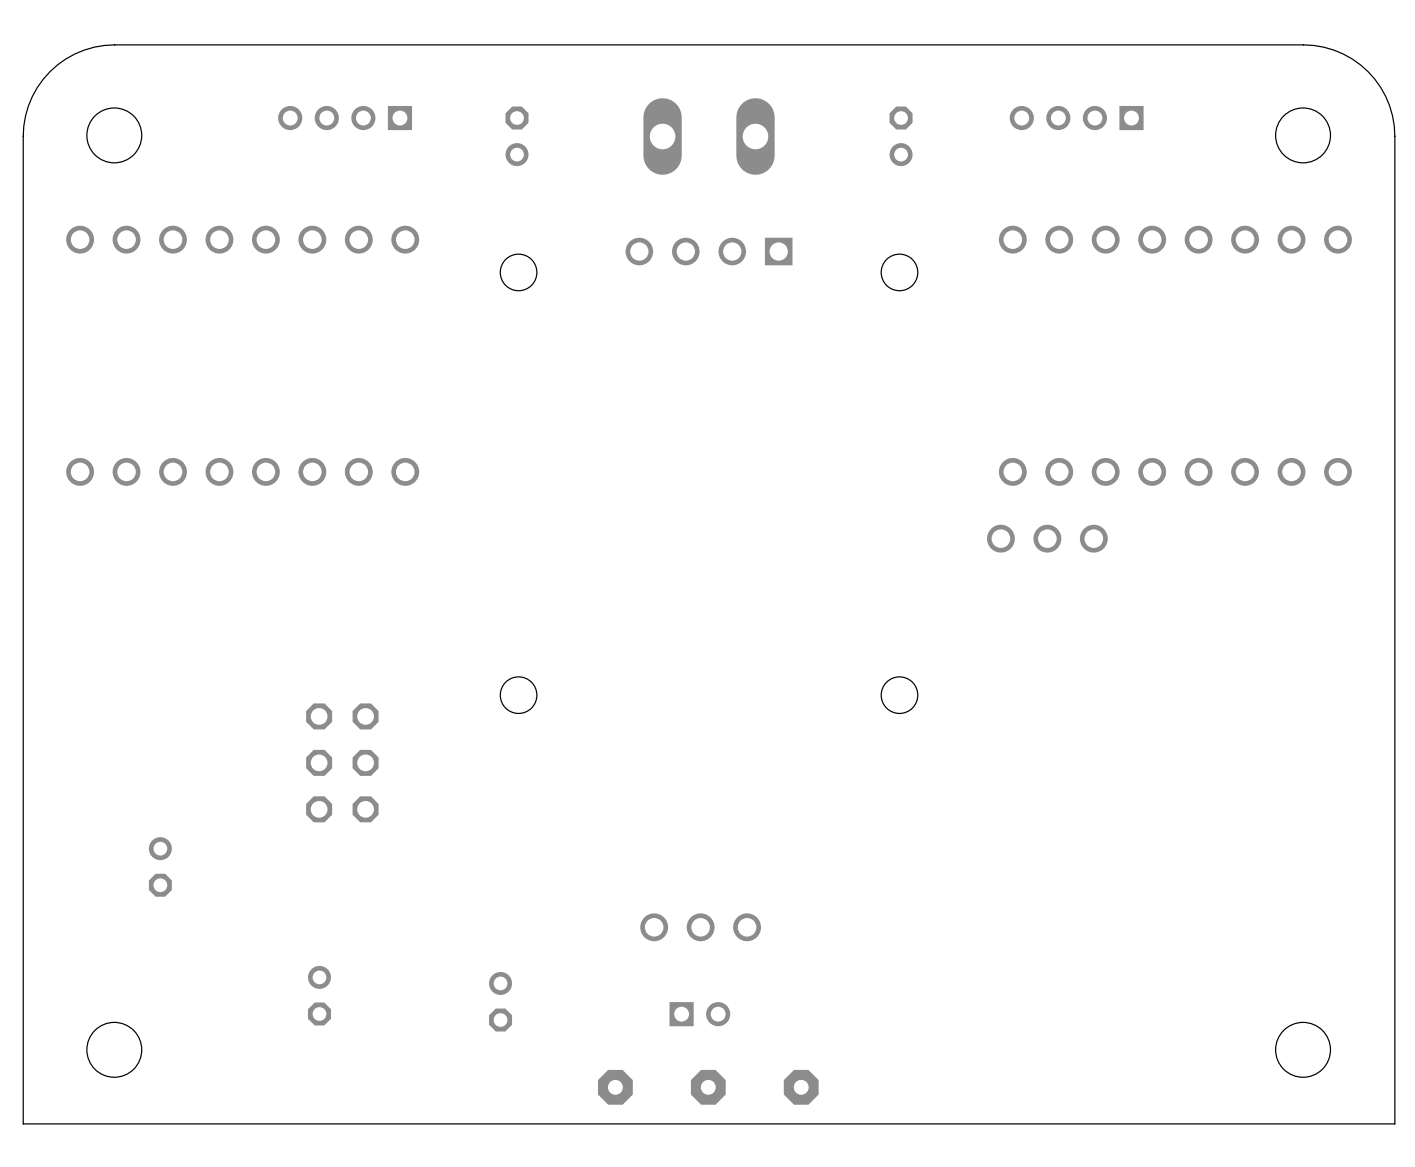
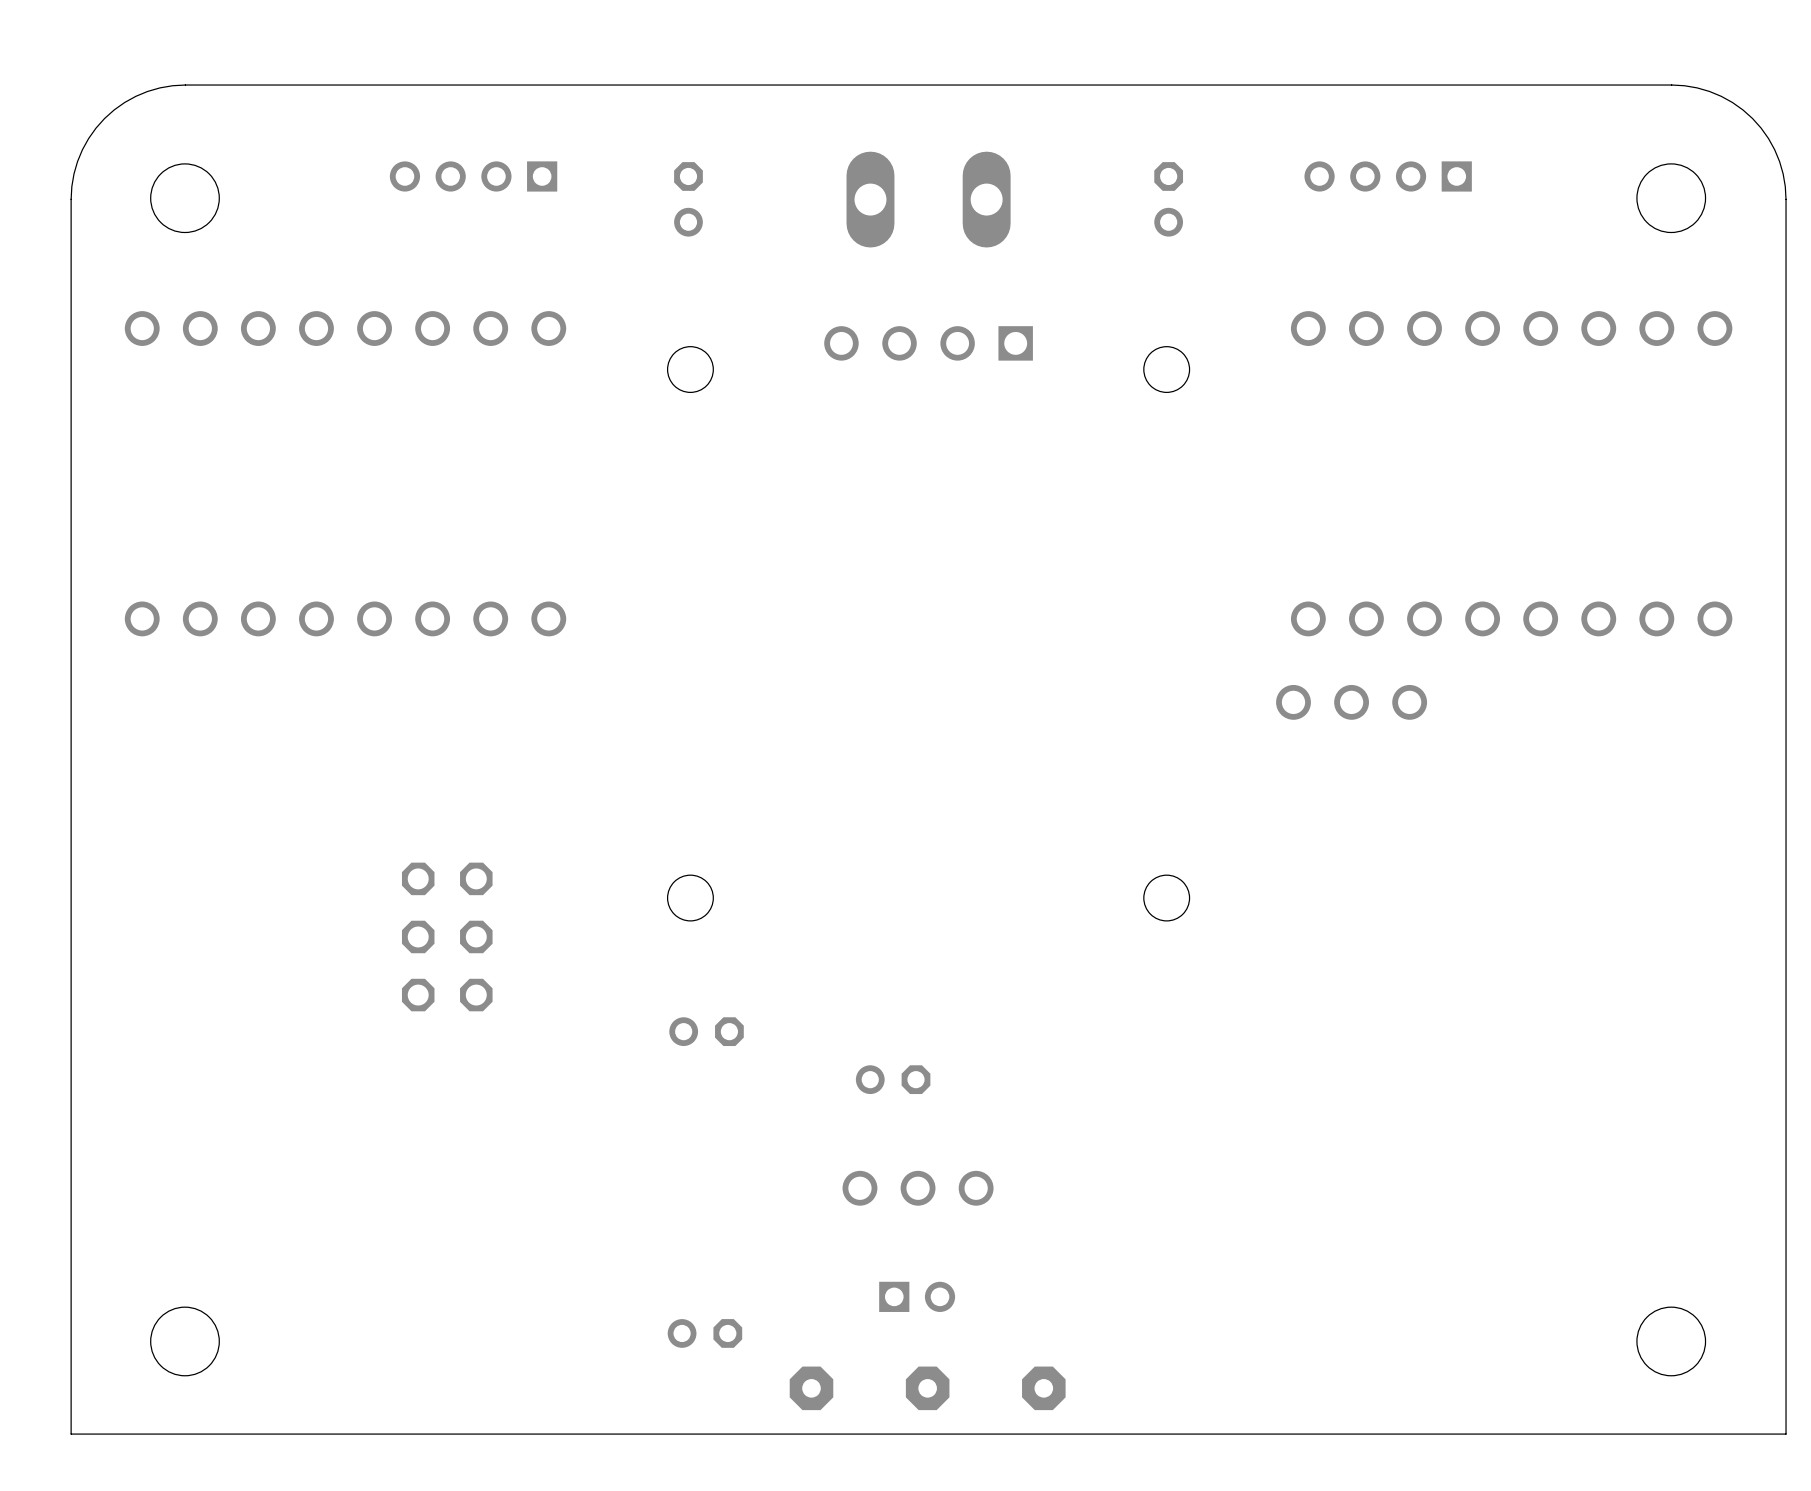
part position: (342, 762) -> (447, 936)
part: none -> (706, 1031)
part: none -> (893, 1079)
part: (160, 866) -> none
part: (319, 995) -> none
part rotation: 0° (500, 1001) -> 90° counterclockwise (704, 1333)
part position: (500, 1001) -> (704, 1333)

